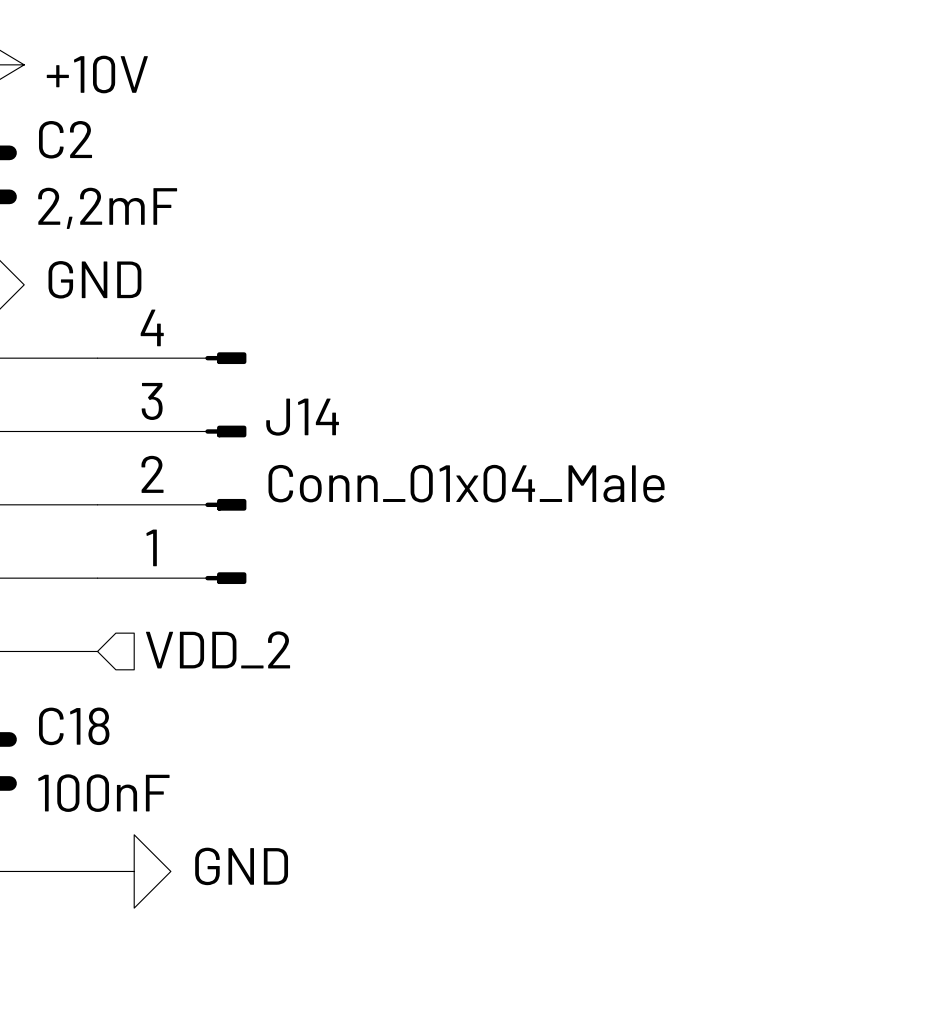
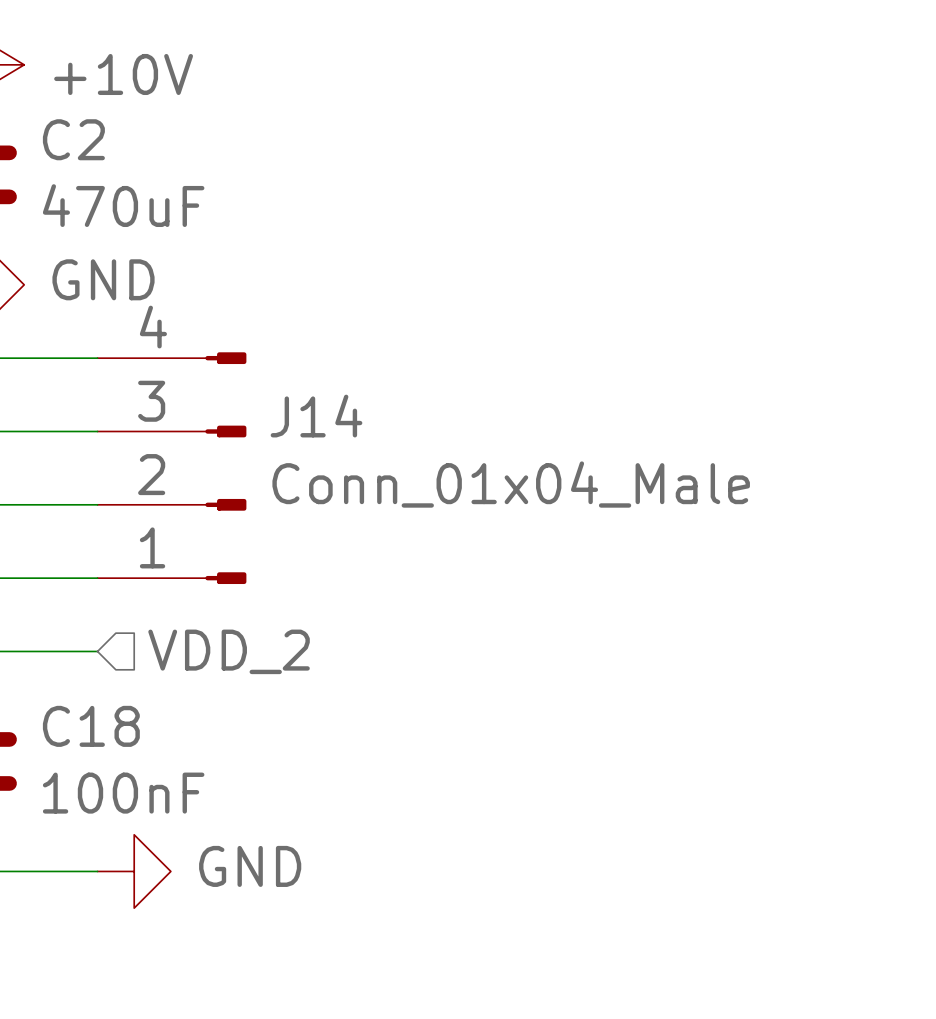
C2 value: 2,2mF (107, 208) -> 470uF (123, 205)

